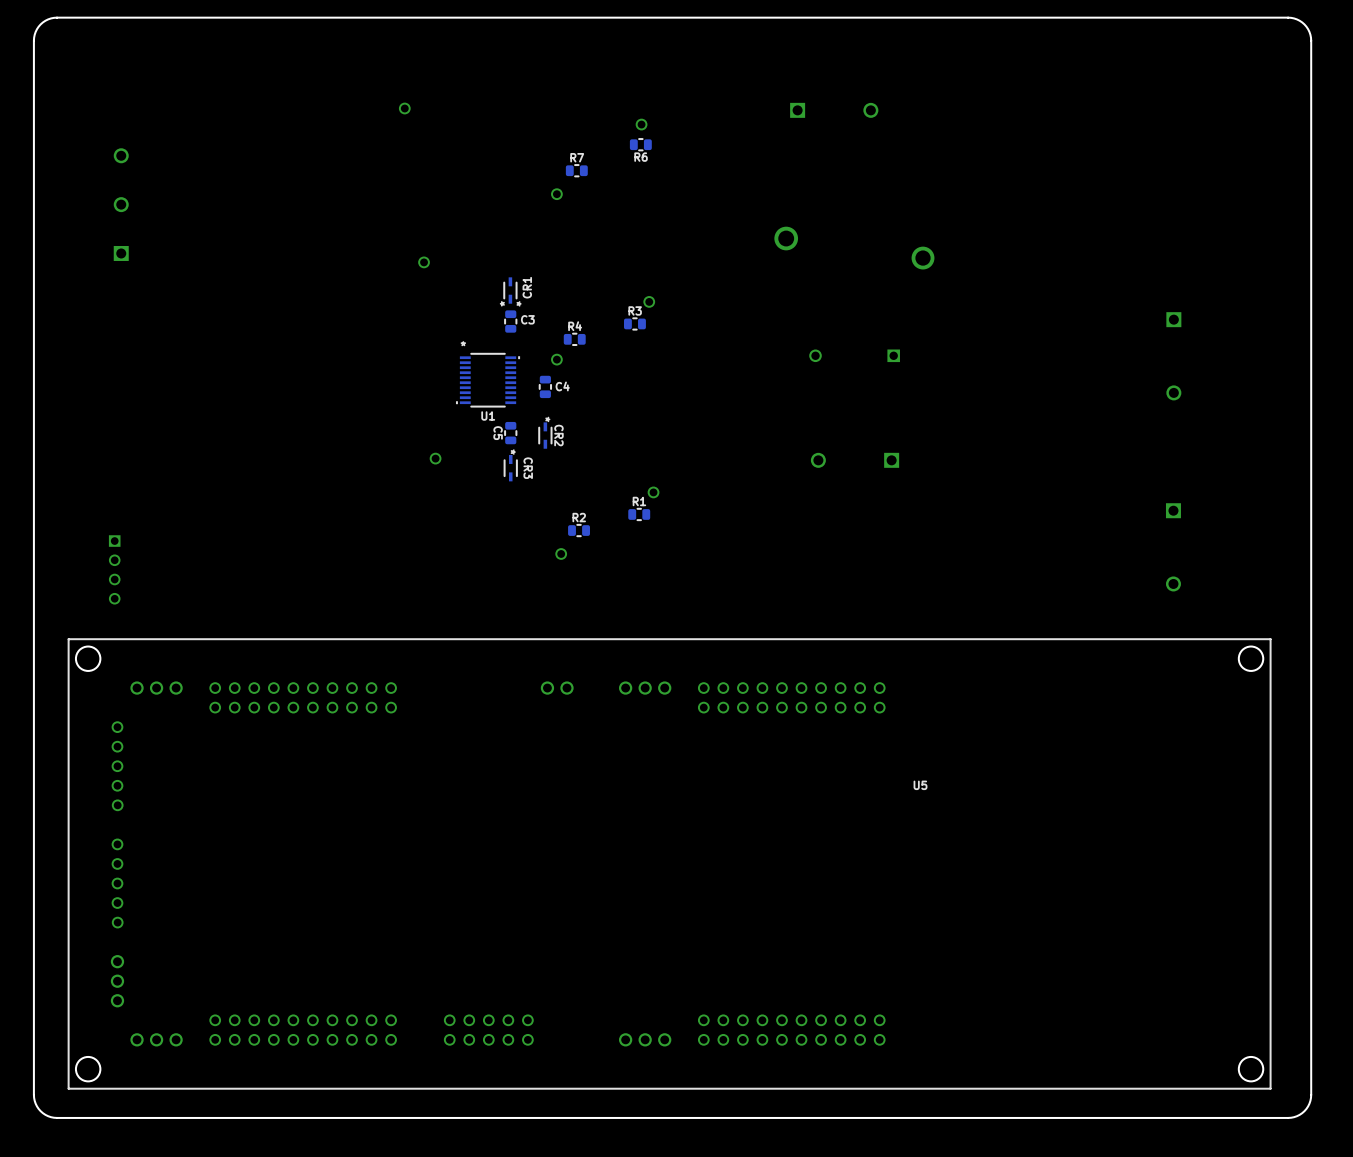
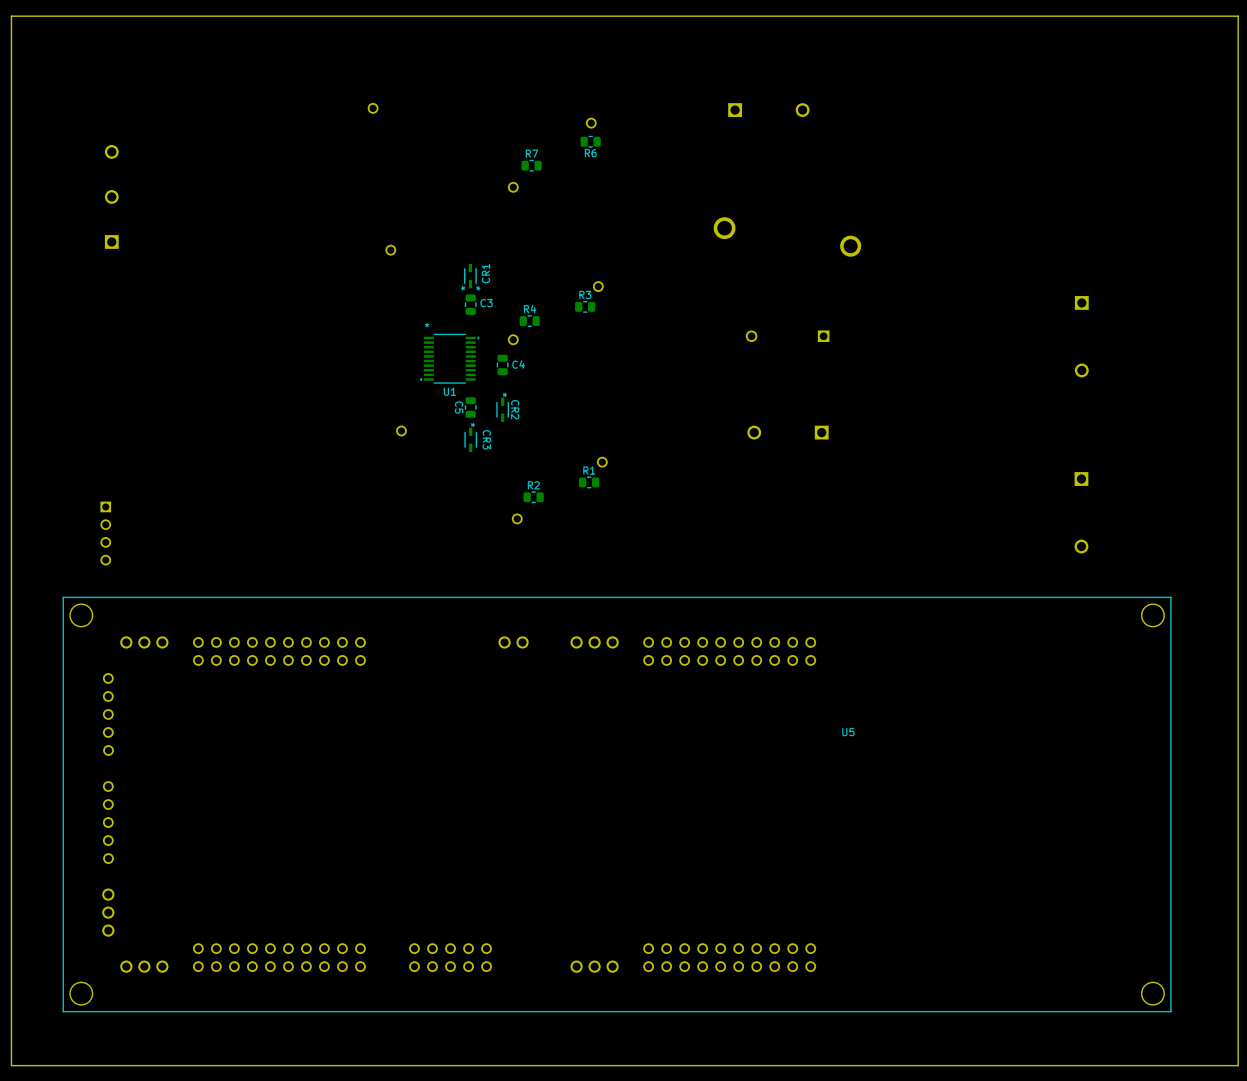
board edge: (1288, 17) (57, 17) (42, 22) (37, 29) (33, 40) (33, 1094) (38, 1108) (45, 1114) (57, 1117) (1288, 1117) (1302, 1113) (1308, 1106) (1311, 1094) (1311, 40) (1309, 31) (1304, 24) (1296, 19) (1288, 17) -> (1238, 16) (1238, 1065) (11, 1065) (11, 16) (1238, 16)

